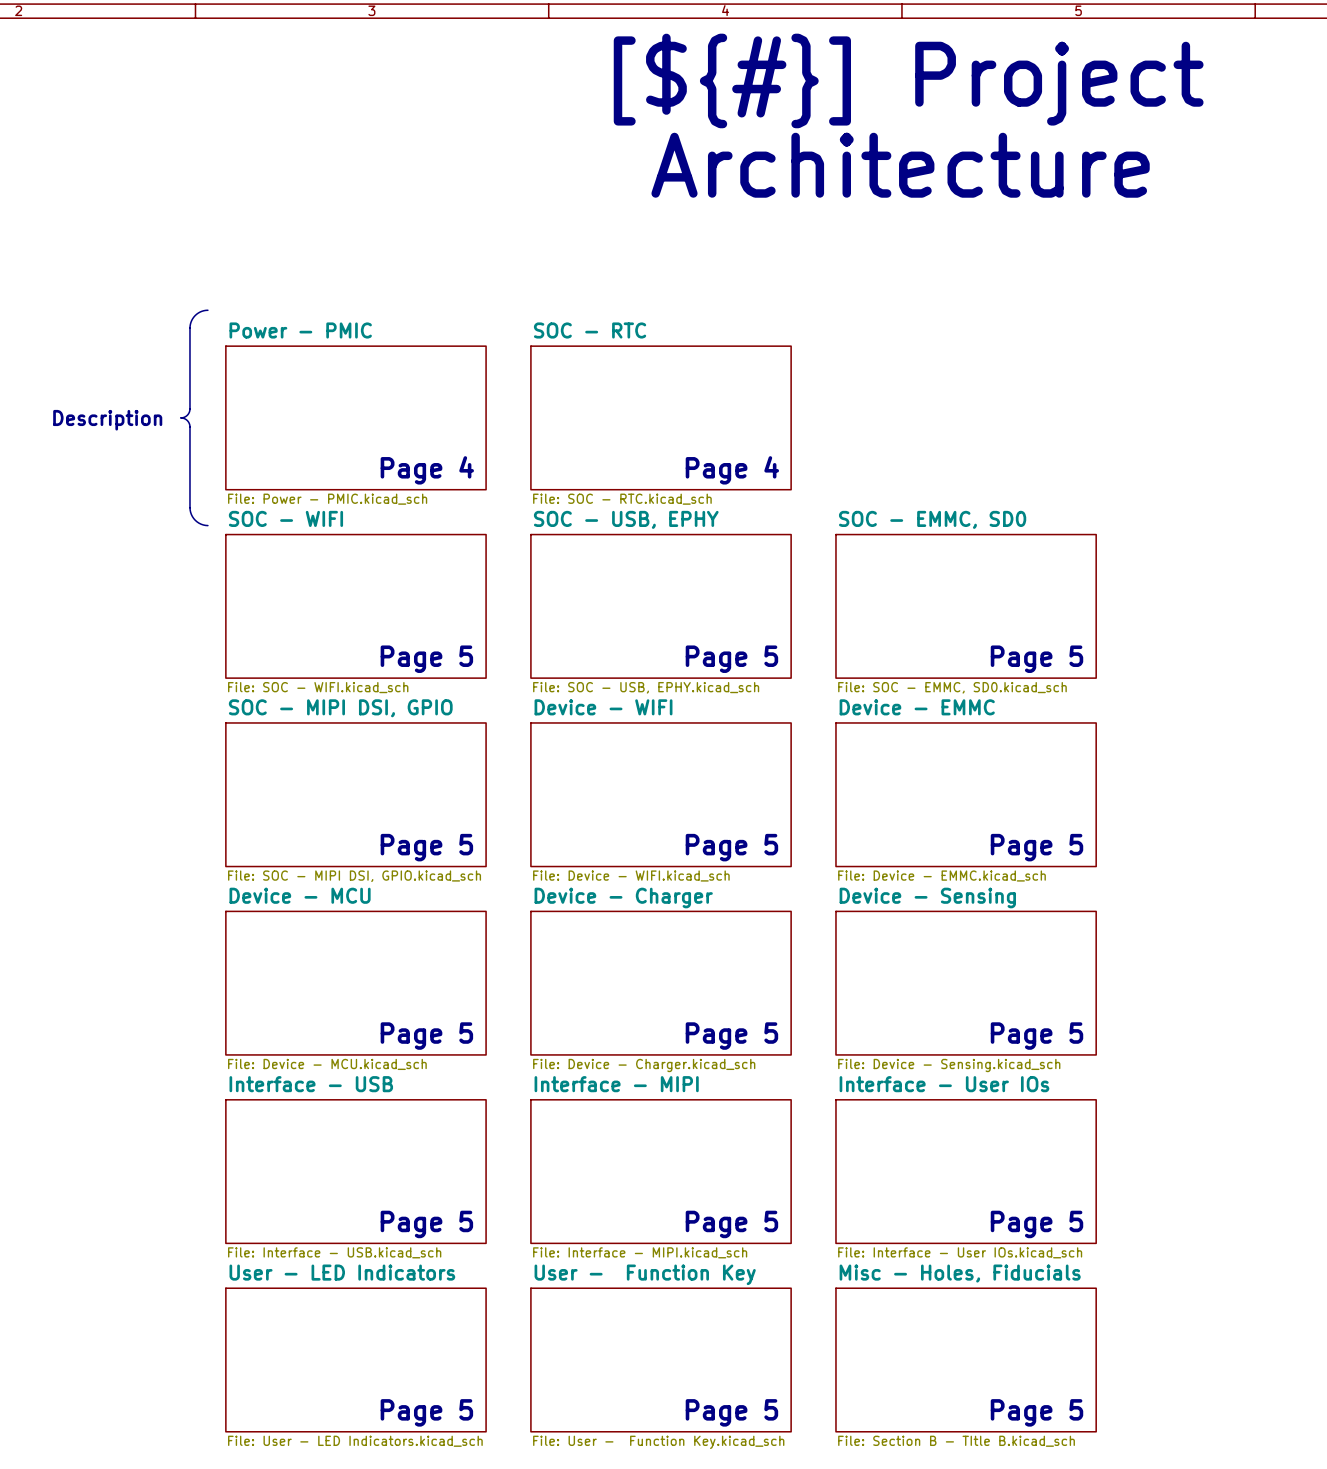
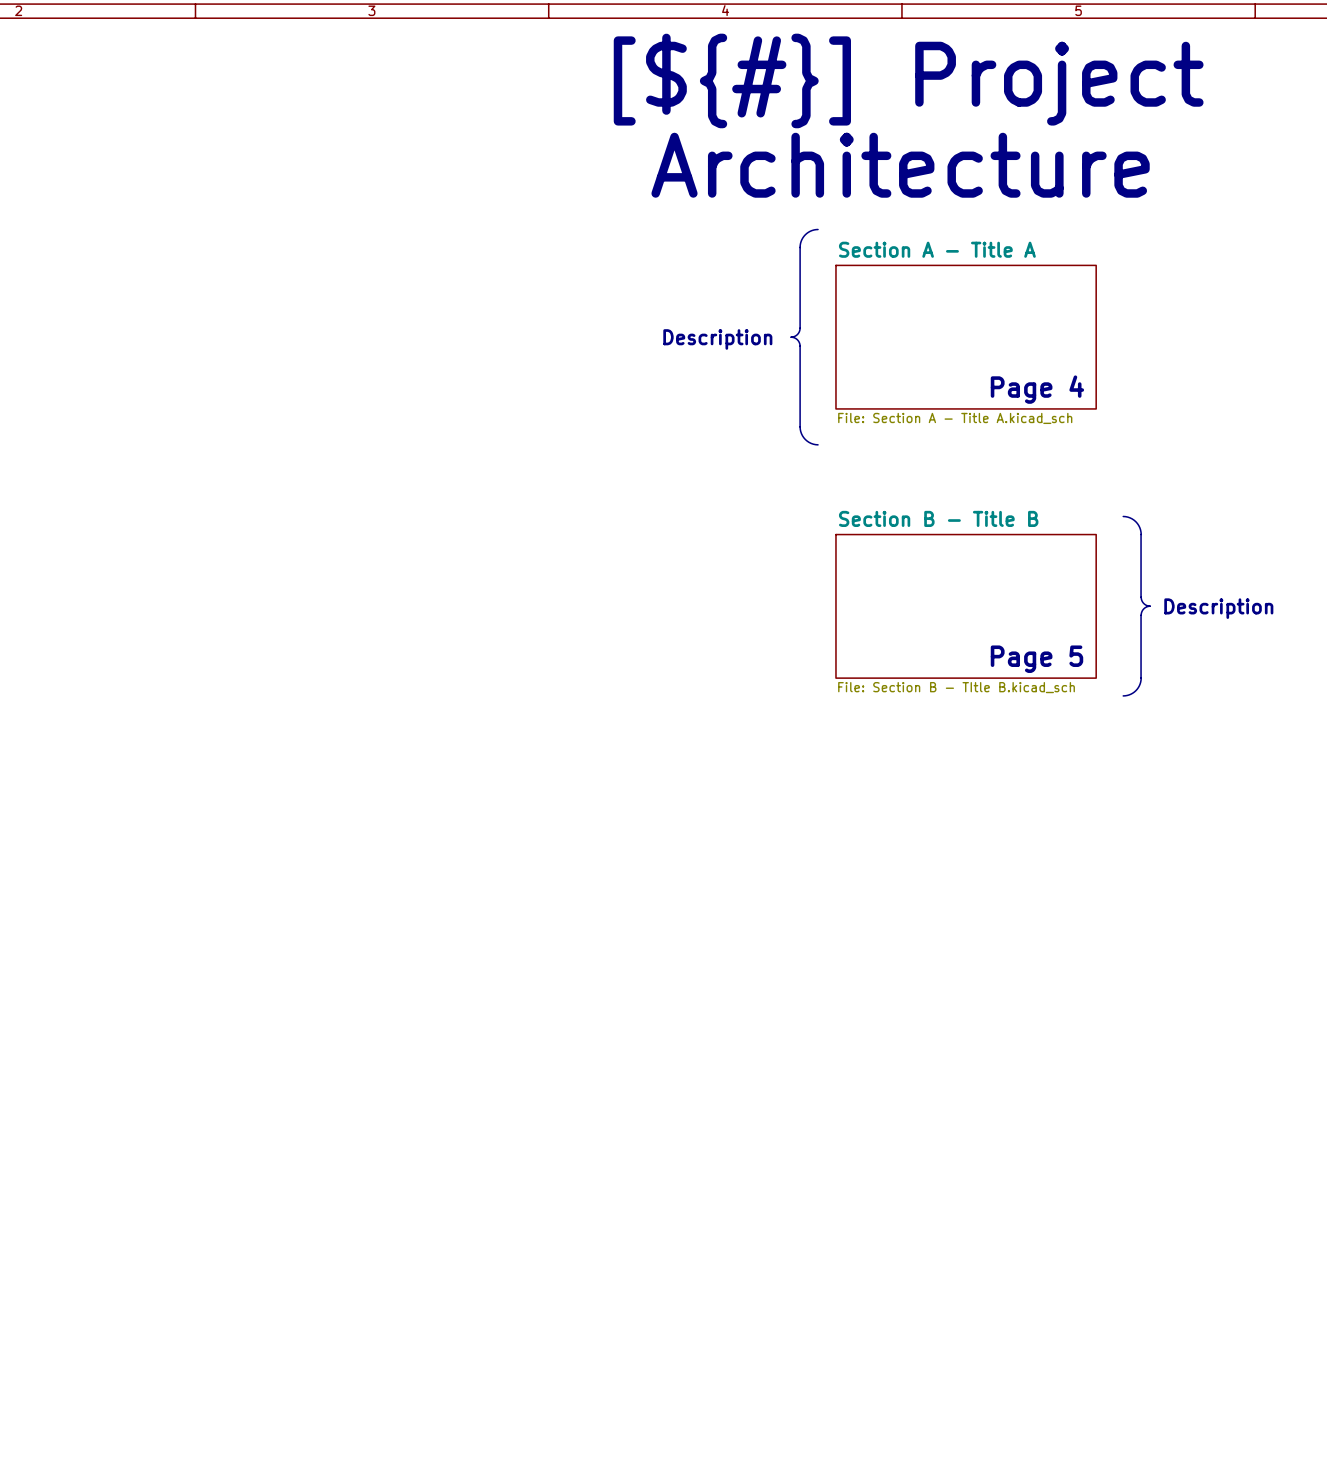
line: none -> (818, 229) (806, 233) (800, 243) (800, 329) (796, 335) (791, 337) (796, 339) (800, 344) (800, 431) (807, 441) (818, 444)
line: (207, 310) (196, 314) (190, 324) (189, 410) (187, 415) (181, 417) (186, 419) (189, 425) (190, 512) (197, 521) (207, 525) -> none
sheet Section A - Title A: none -> File: Section A - Title A.kicad_sch (966, 337)
text: none -> Description (717, 339)
text: none -> Page 4 (1037, 389)
sheet Power - PMIC: File: Power - PMIC.kicad_sch (355, 417) -> none
sheet SOC - RTC: File: SOC - RTC.kicad_sch (661, 417) -> none
text: Description (107, 420) -> none
text: Page 4 (427, 470) -> none
text: Page 4 (732, 470) -> none
line: none -> (1123, 516) (1135, 521) (1141, 534)
sheet SOC - EMMC, SD0 name: SOC - EMMC, SD0 (932, 519) -> Section B - Title B (938, 518)
line: none -> (1141, 534) (1141, 597)
line: none -> (1141, 597) (1143, 603) (1150, 606) (1143, 608) (1141, 615)
sheet SOC - WIFI: File: SOC - WIFI.kicad_sch (355, 606) -> none
sheet SOC - USB, EPHY: File: SOC - USB, EPHY.kicad_sch (661, 606) -> none
text: none -> Description (1218, 608)
line: none -> (1141, 615) (1141, 678)
text: Page 5 (426, 659) -> none
text: Page 5 (731, 659) -> none
line: none -> (1141, 677) (1135, 690) (1123, 695)
sheet SOC - EMMC, SD0 value: File: SOC - EMMC, SD0.kicad_sch (952, 687) -> File: Section B - TItle B.kicad_sch (956, 687)
sheet SOC - MIPI DSI, GPIO: File: SOC - MIPI DSI, GPIO.kicad_sch (355, 794) -> none
sheet Device - WIFI: File: Device - WIFI.kicad_sch (661, 794) -> none
sheet Device - EMMC: File: Device - EMMC.kicad_sch (966, 794) -> none
text: Page 5 (426, 847) -> none
text: Page 5 (731, 847) -> none
text: Page 5 (1036, 847) -> none
sheet Device - MCU: File: Device - MCU.kicad_sch (355, 983) -> none
sheet Device - Charger: File: Device - Charger.kicad_sch (661, 983) -> none
sheet Device - Sensing: File: Device - Sensing.kicad_sch (966, 983) -> none
text: Page 5 (426, 1036) -> none
text: Page 5 (731, 1036) -> none
text: Page 5 (1036, 1036) -> none
sheet Interface - USB: File: Interface - USB.kicad_sch (355, 1171) -> none
sheet Interface - MIPI: File: Interface - MIPI.kicad_sch (661, 1171) -> none
sheet Interface - User IOs: File: Interface - User IOs.kicad_sch (966, 1171) -> none
text: Page 5 (426, 1224) -> none
text: Page 5 (731, 1224) -> none
text: Page 5 (1036, 1224) -> none
sheet User - LED Indicators: File: User - LED Indicators.kicad_sch (355, 1360) -> none
sheet User - Function Key: File: User - Function Key.kicad_sch (661, 1360) -> none
sheet Misc - Holes, Fiducials: File: Section B - TItle B.kicad_sch (966, 1360) -> none
text: Page 5 (426, 1412) -> none
text: Page 5 (731, 1412) -> none
text: Page 5 (1036, 1412) -> none

